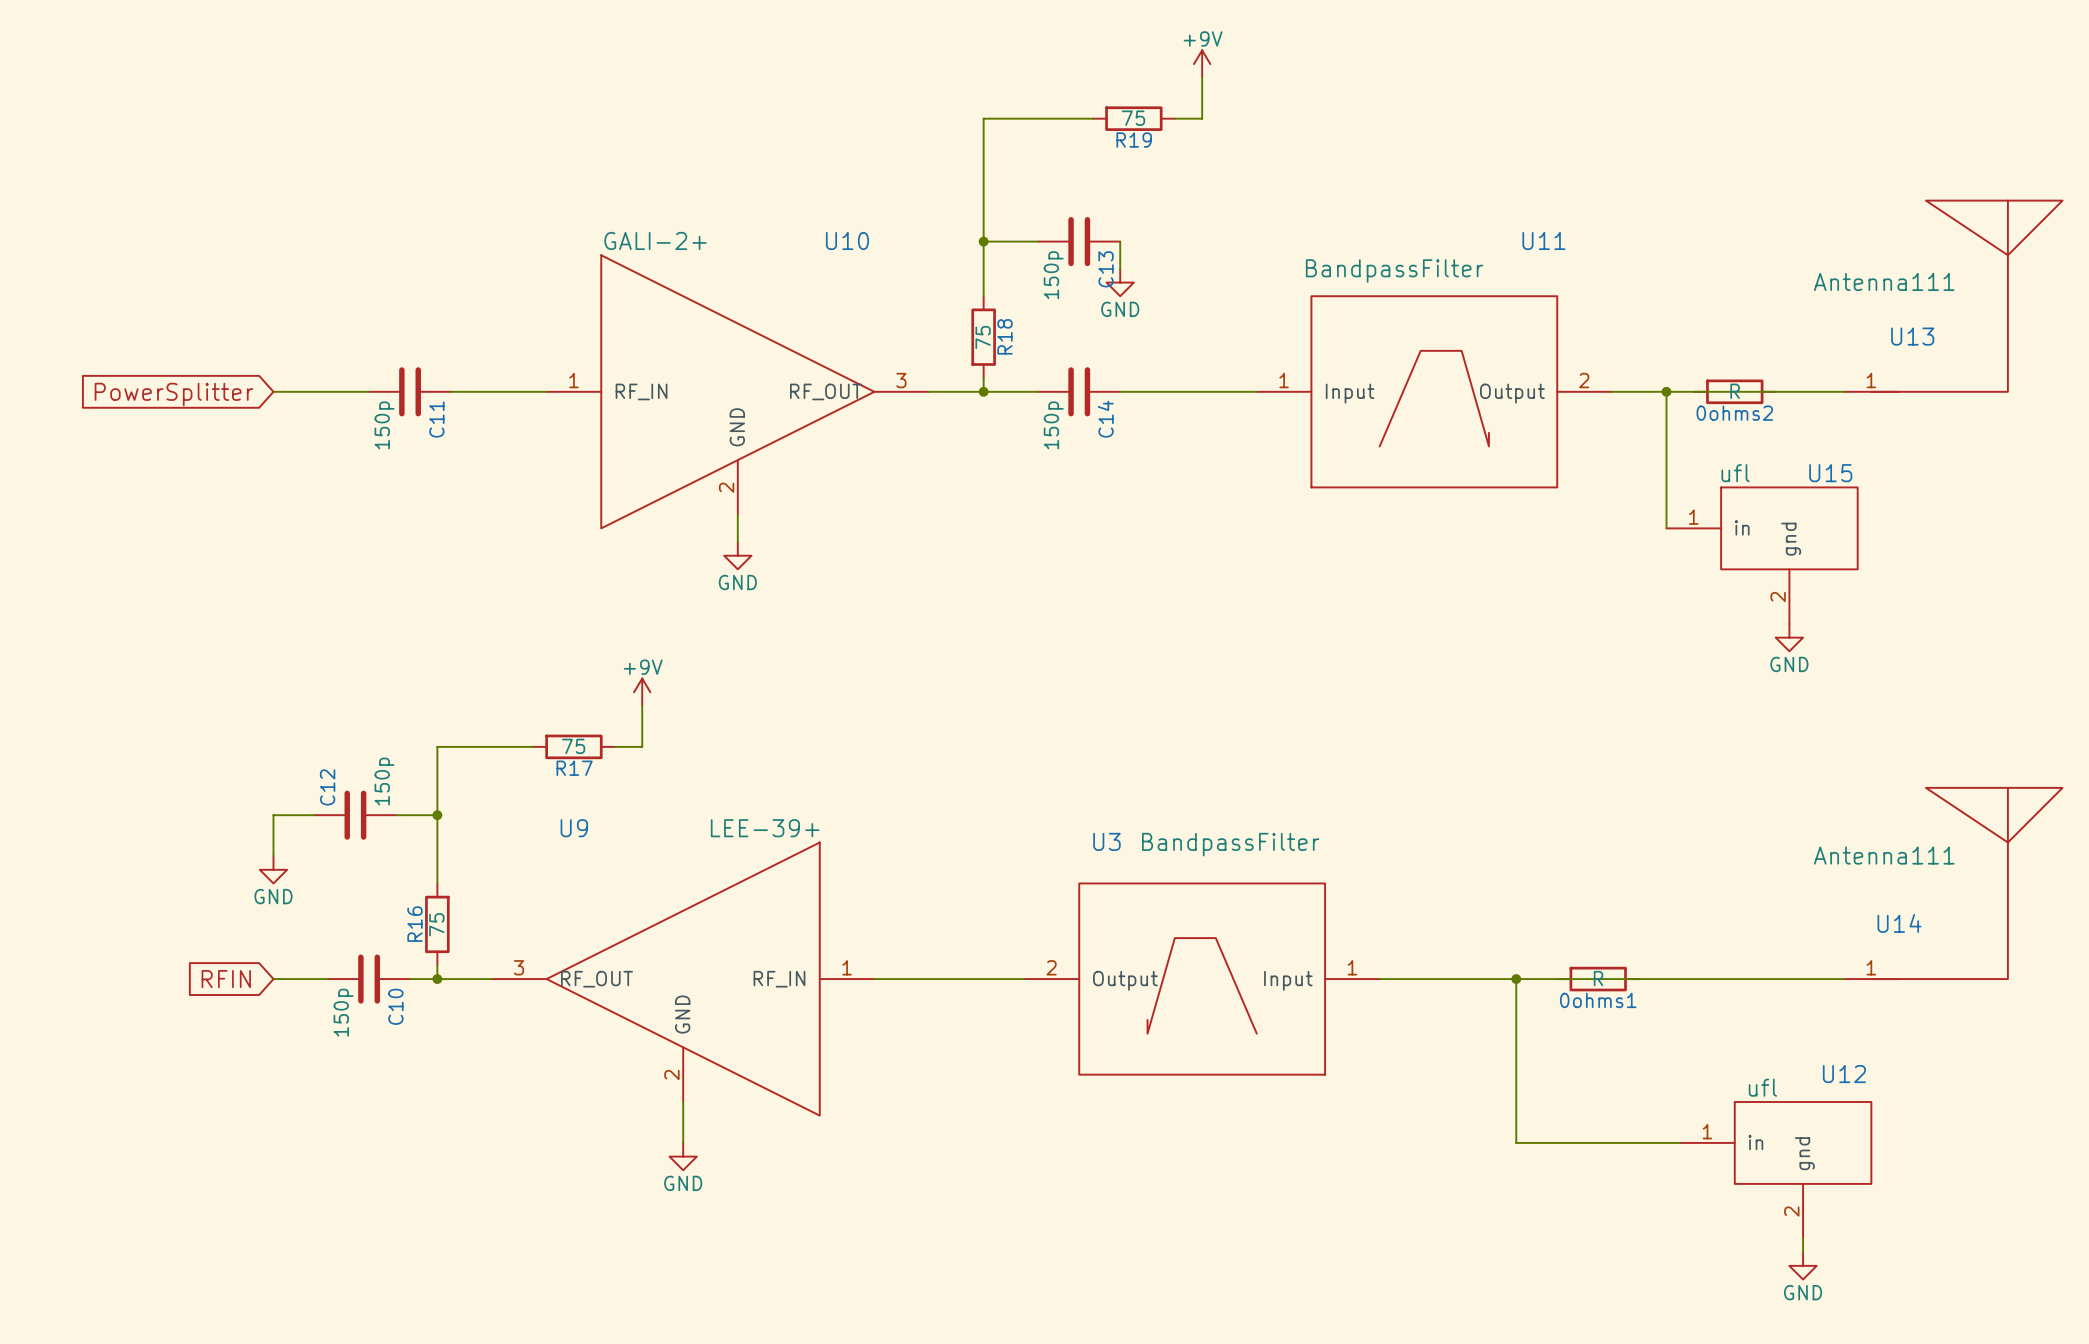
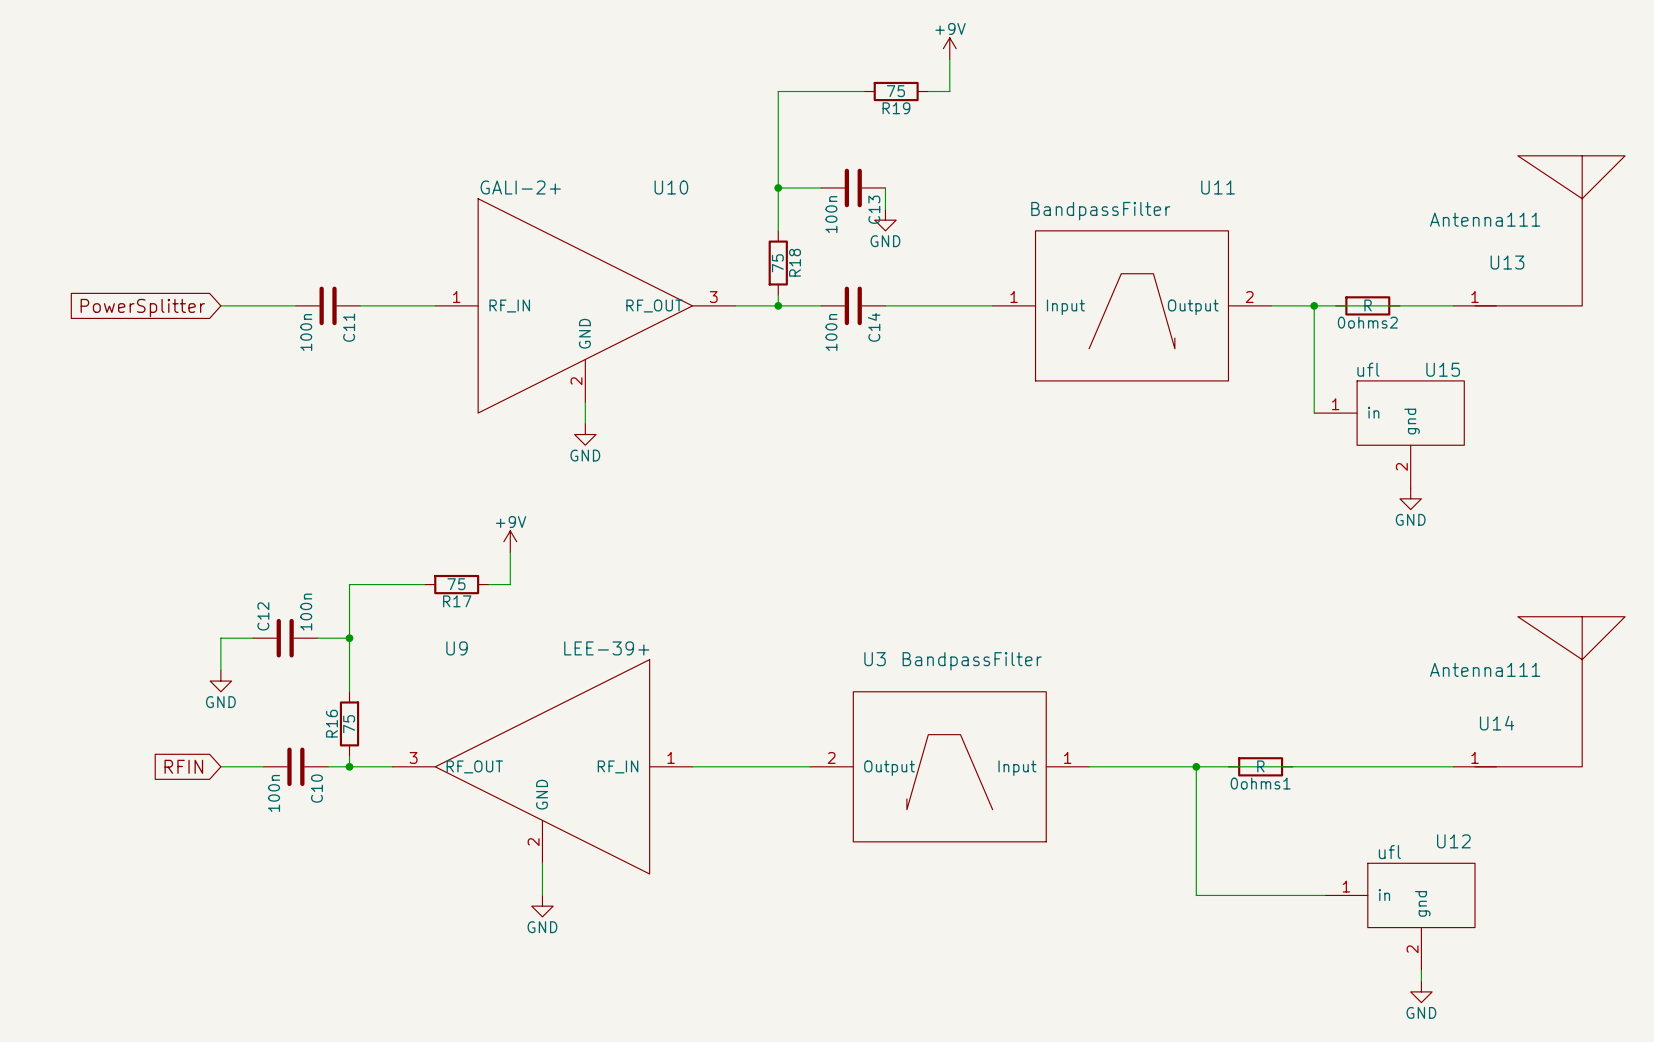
C13 value: 150p (1053, 275) -> 100n (831, 214)
C11 value: 150p (384, 425) -> 100n (306, 332)
C14 value: 150p (1053, 425) -> 100n (831, 332)
C12 value: 150p (384, 781) -> 100n (306, 612)
C10 value: 150p (343, 1012) -> 100n (274, 793)

